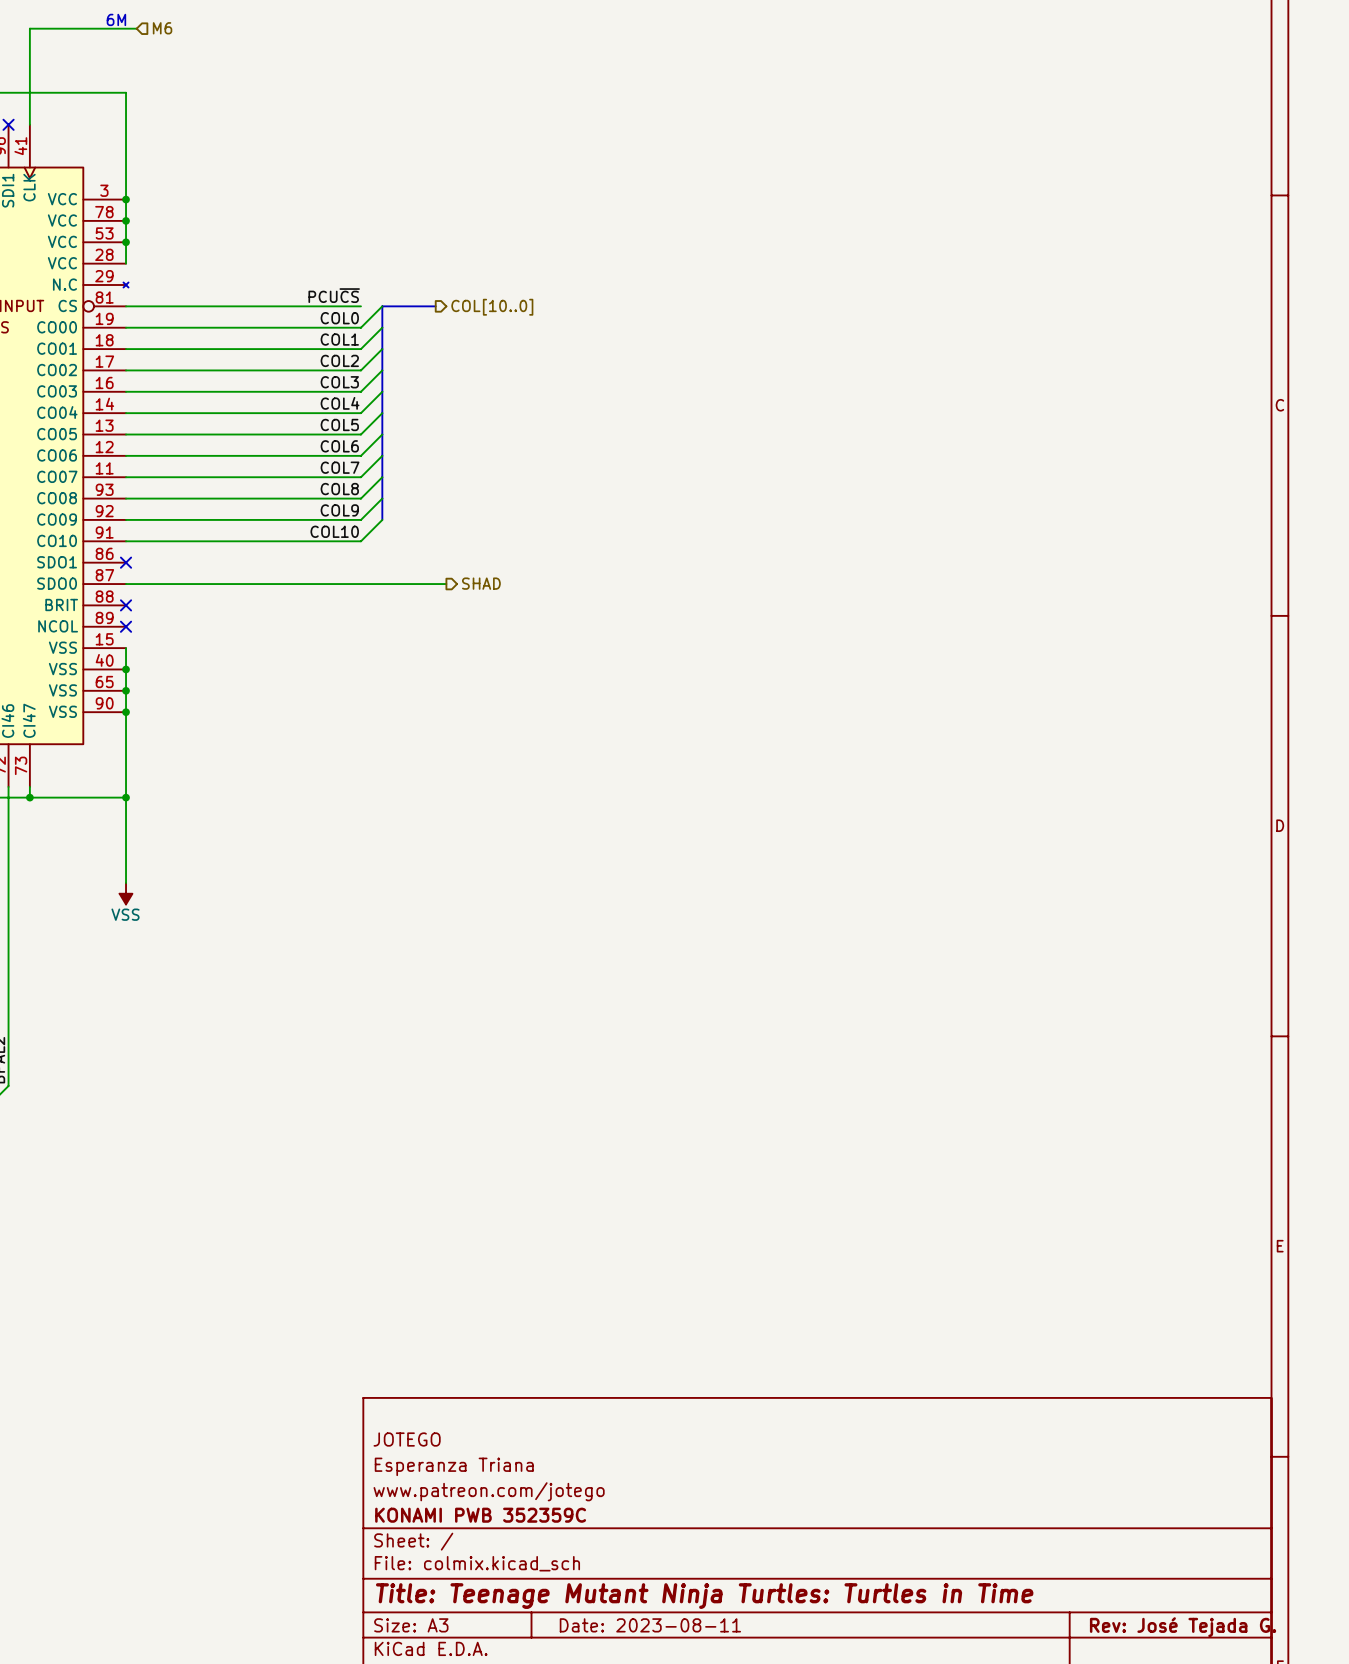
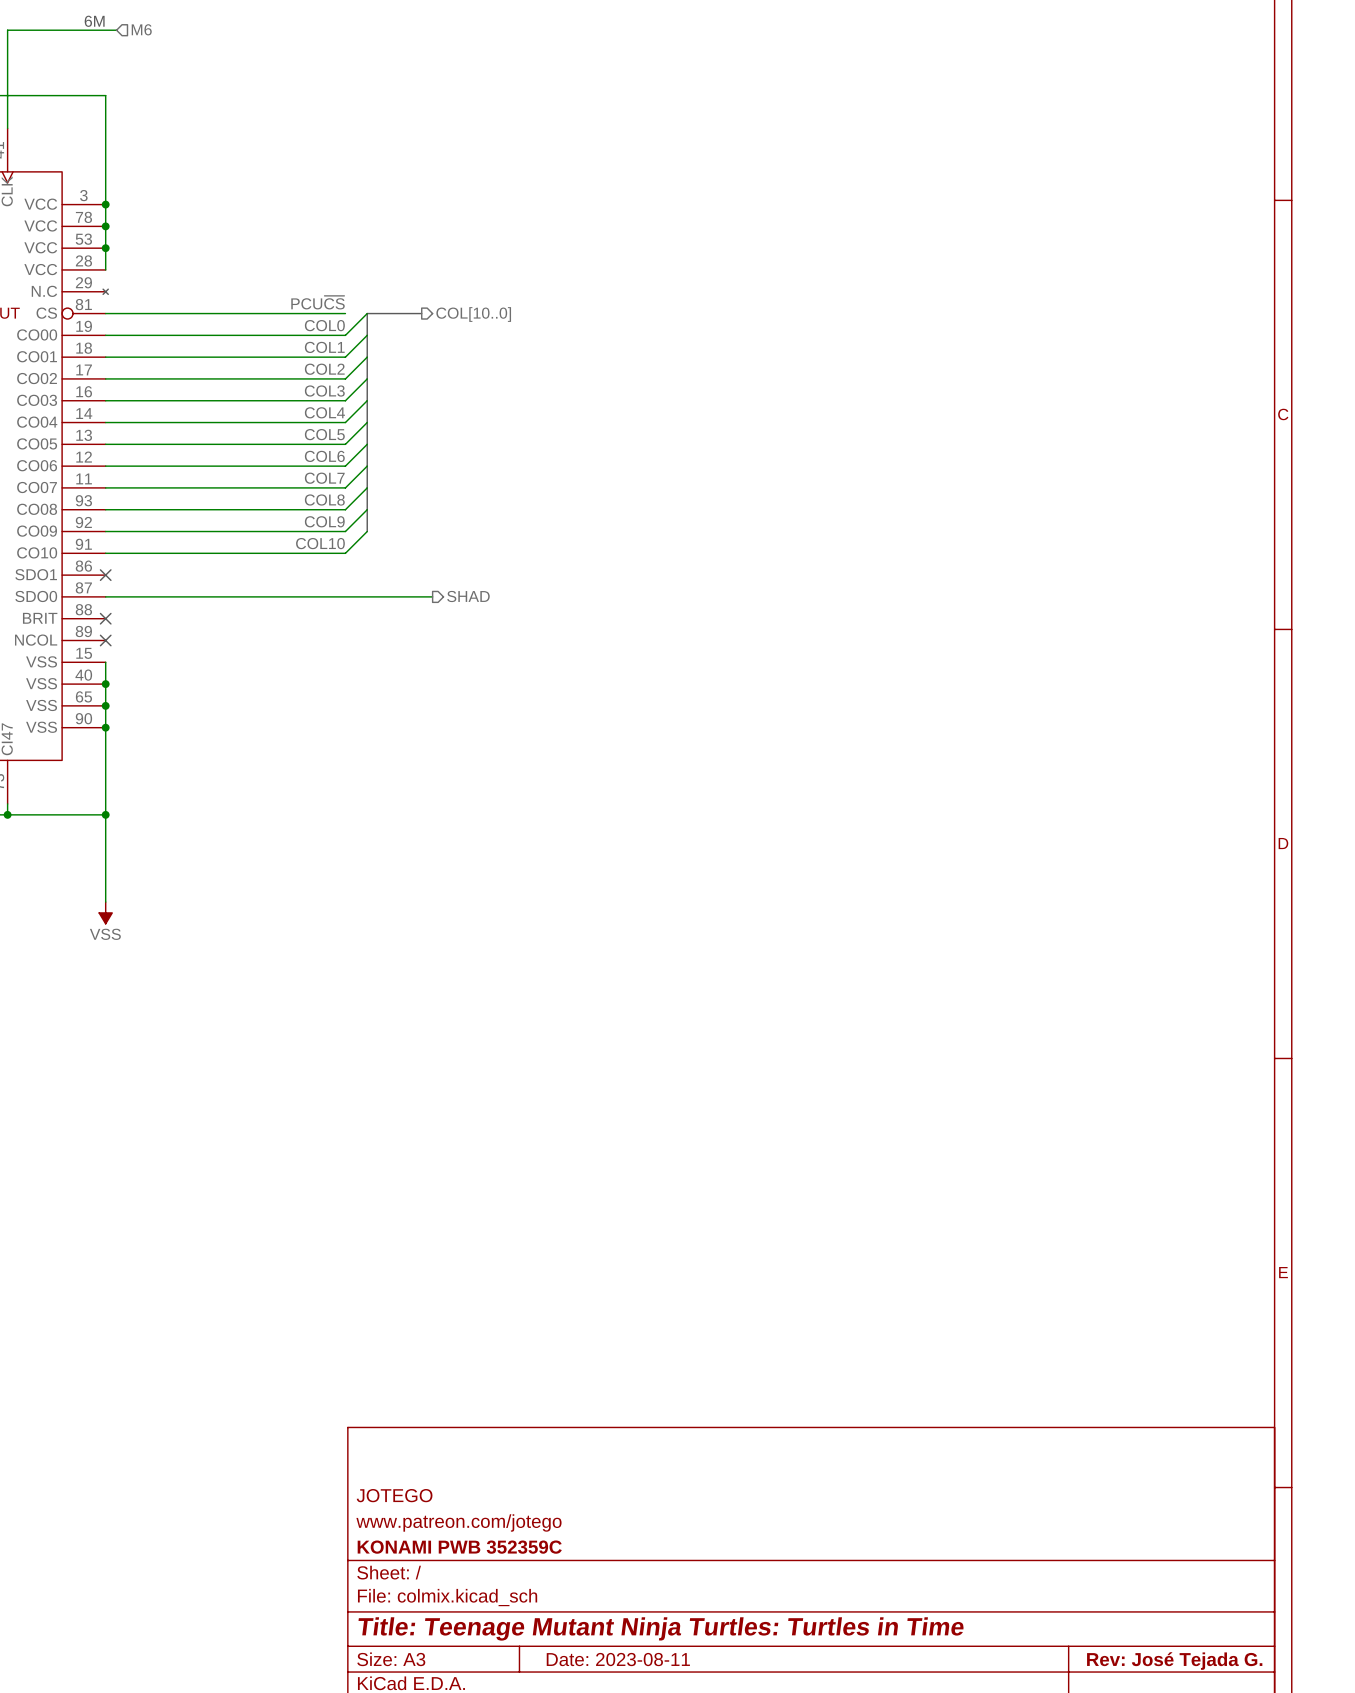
title block: JOTEGO (407, 1439) -> none
title block: Esperanza Triana (454, 1466) -> JOTEGO (394, 1495)

